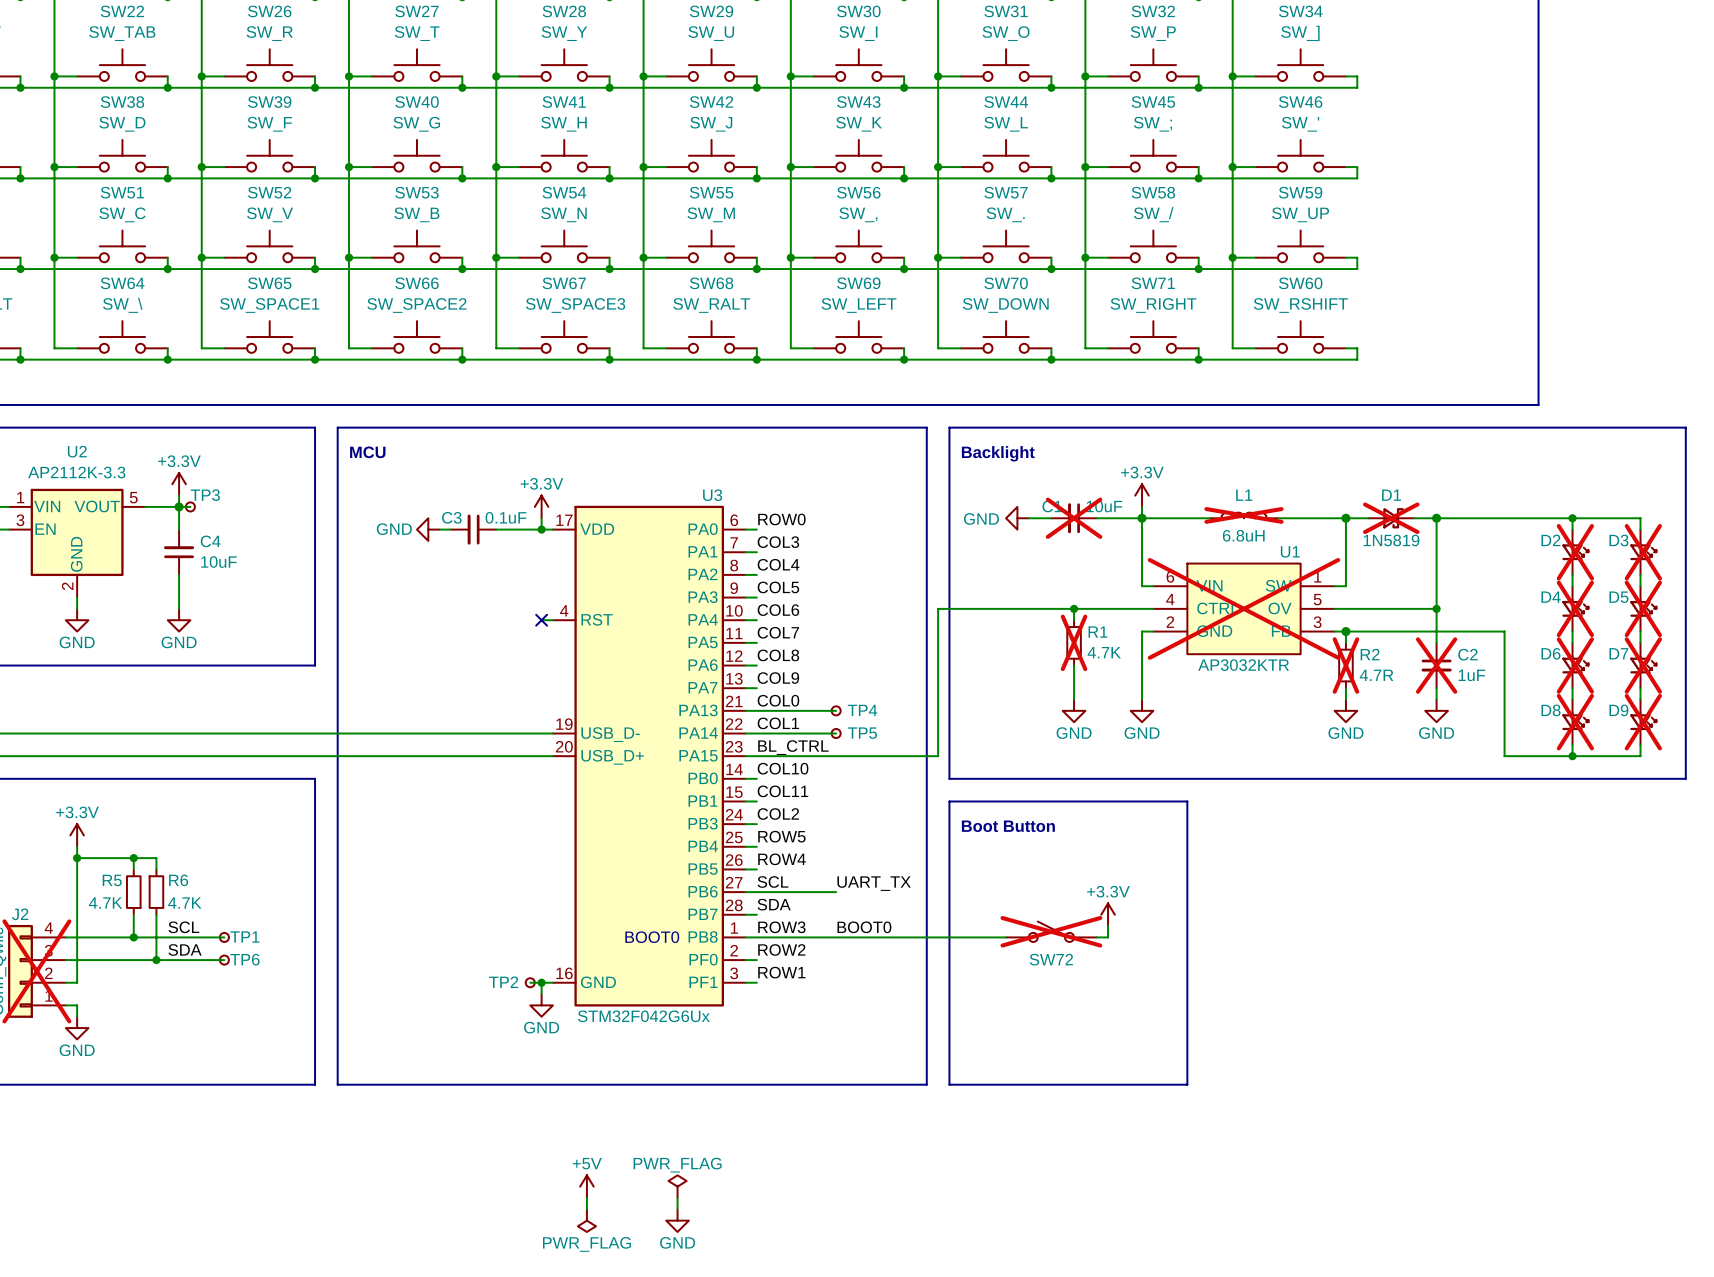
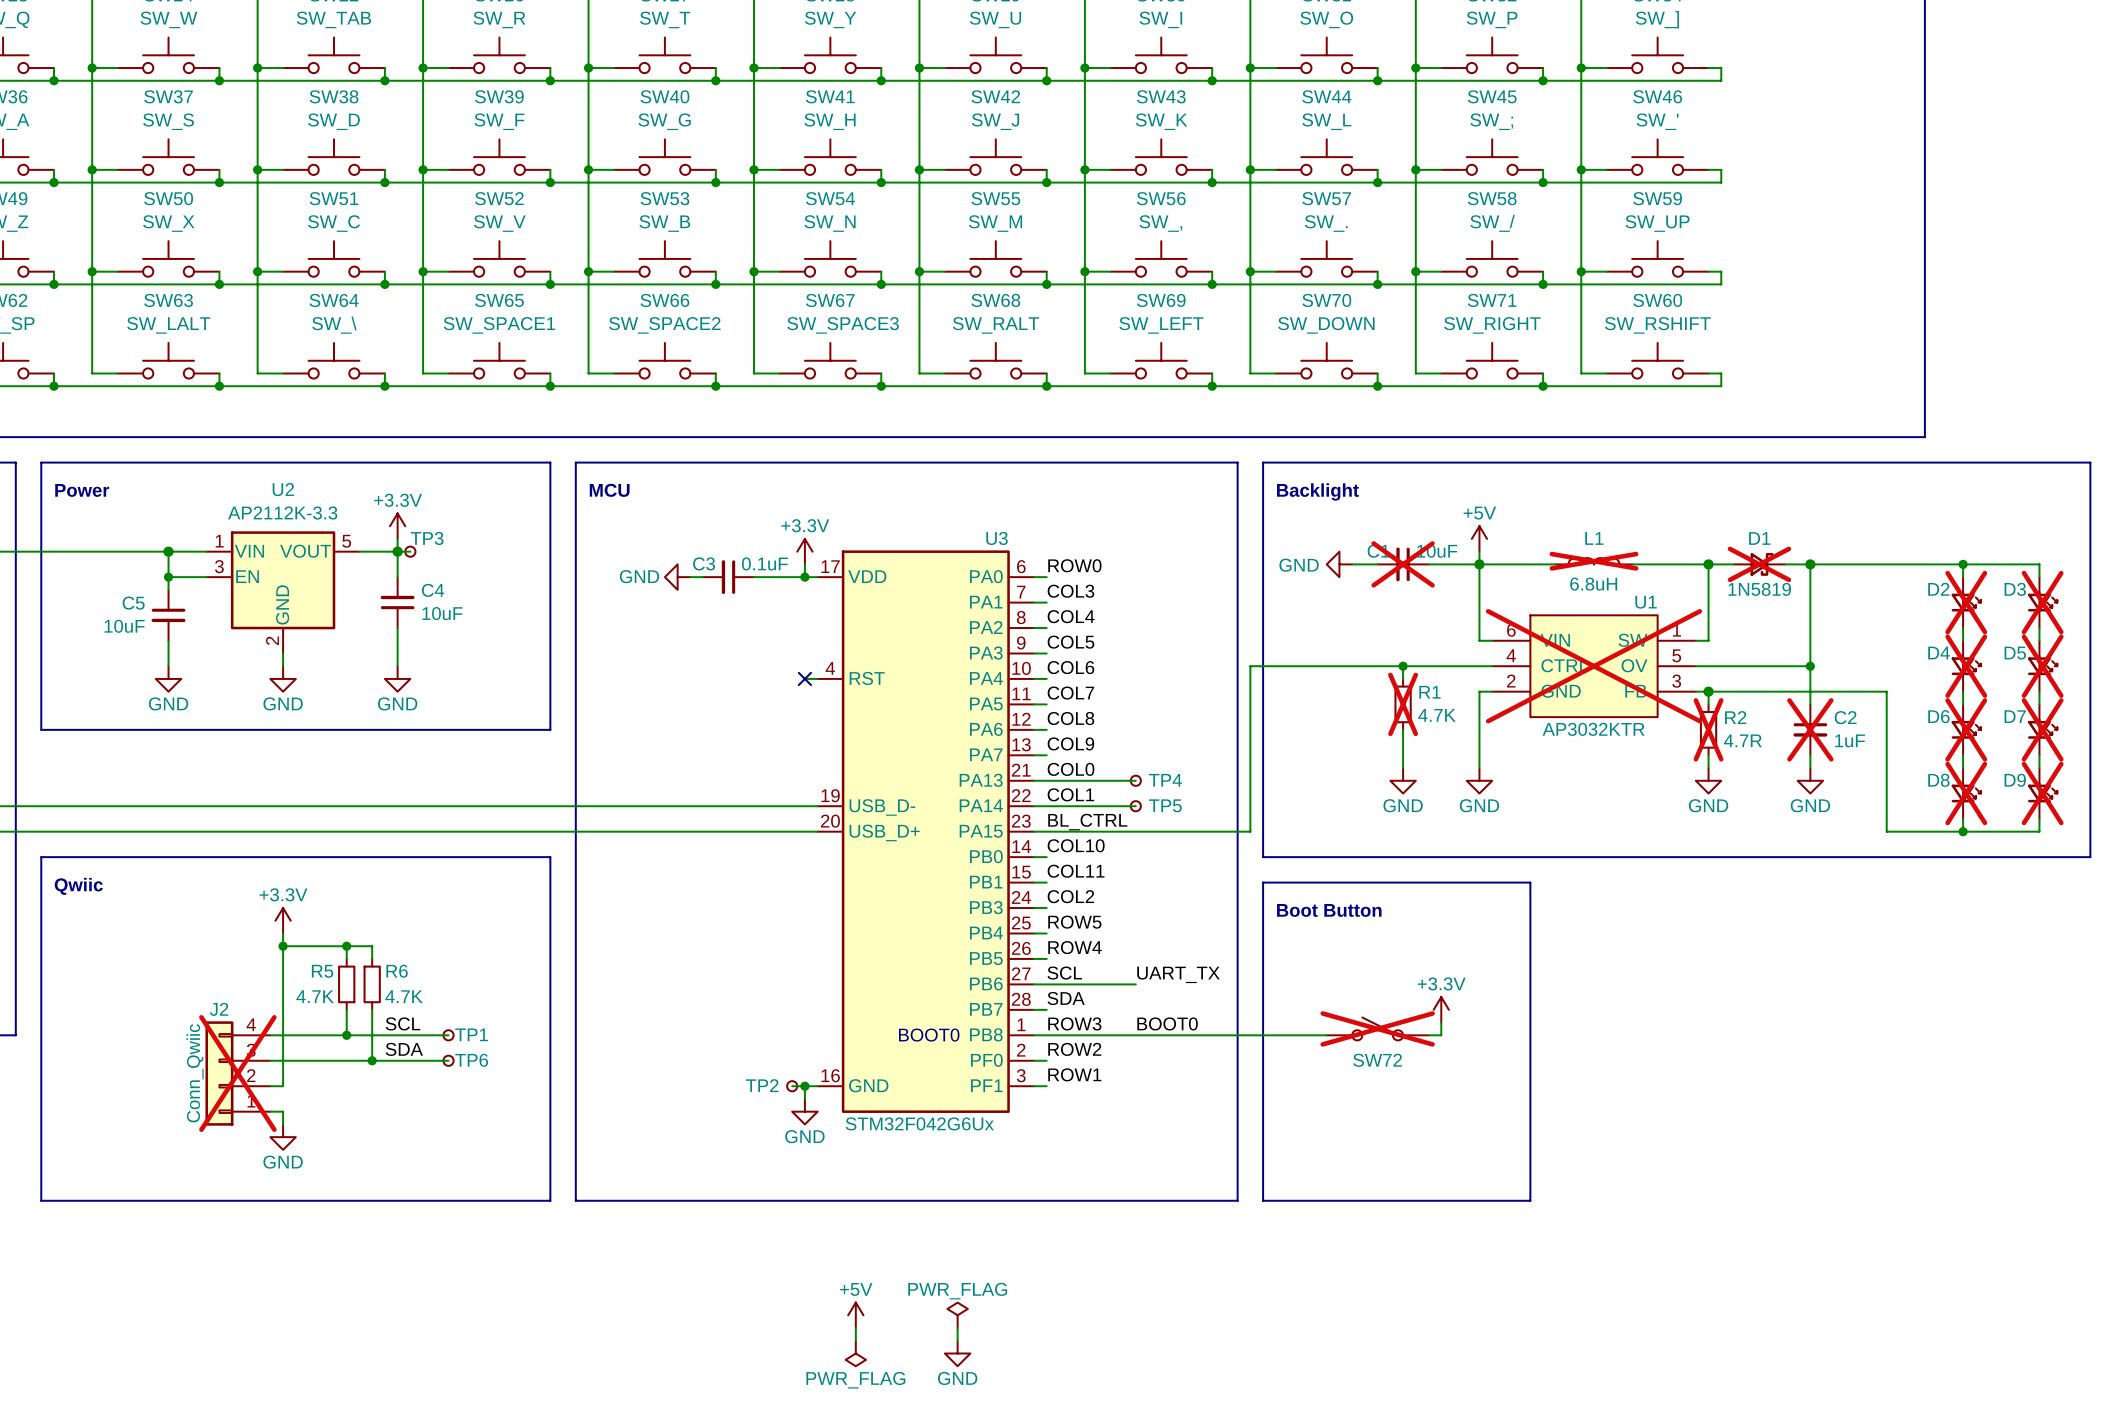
power symbol: +3.3V (1142, 495) -> +5V (1479, 538)

